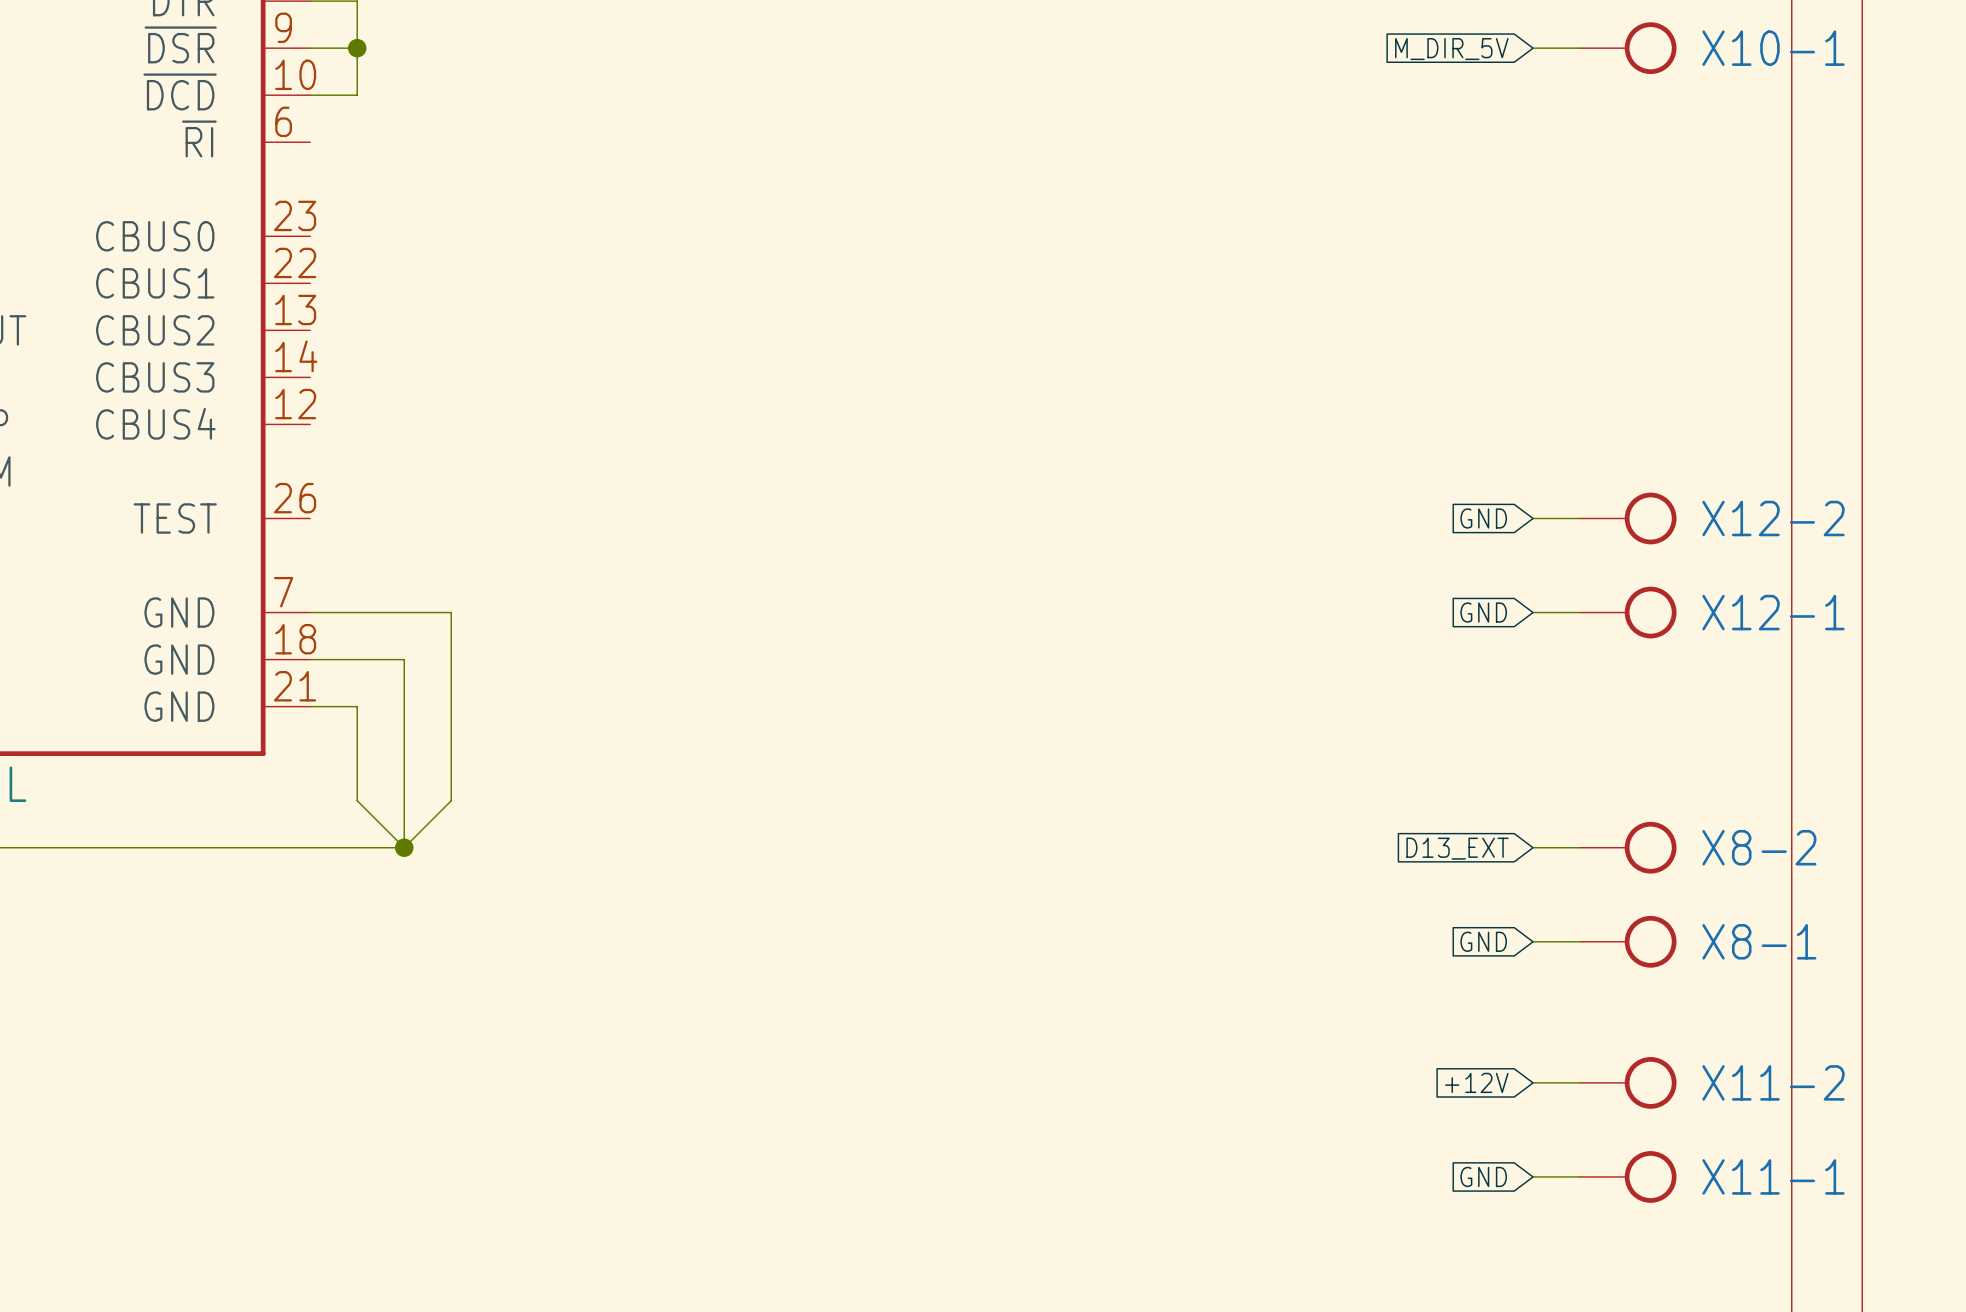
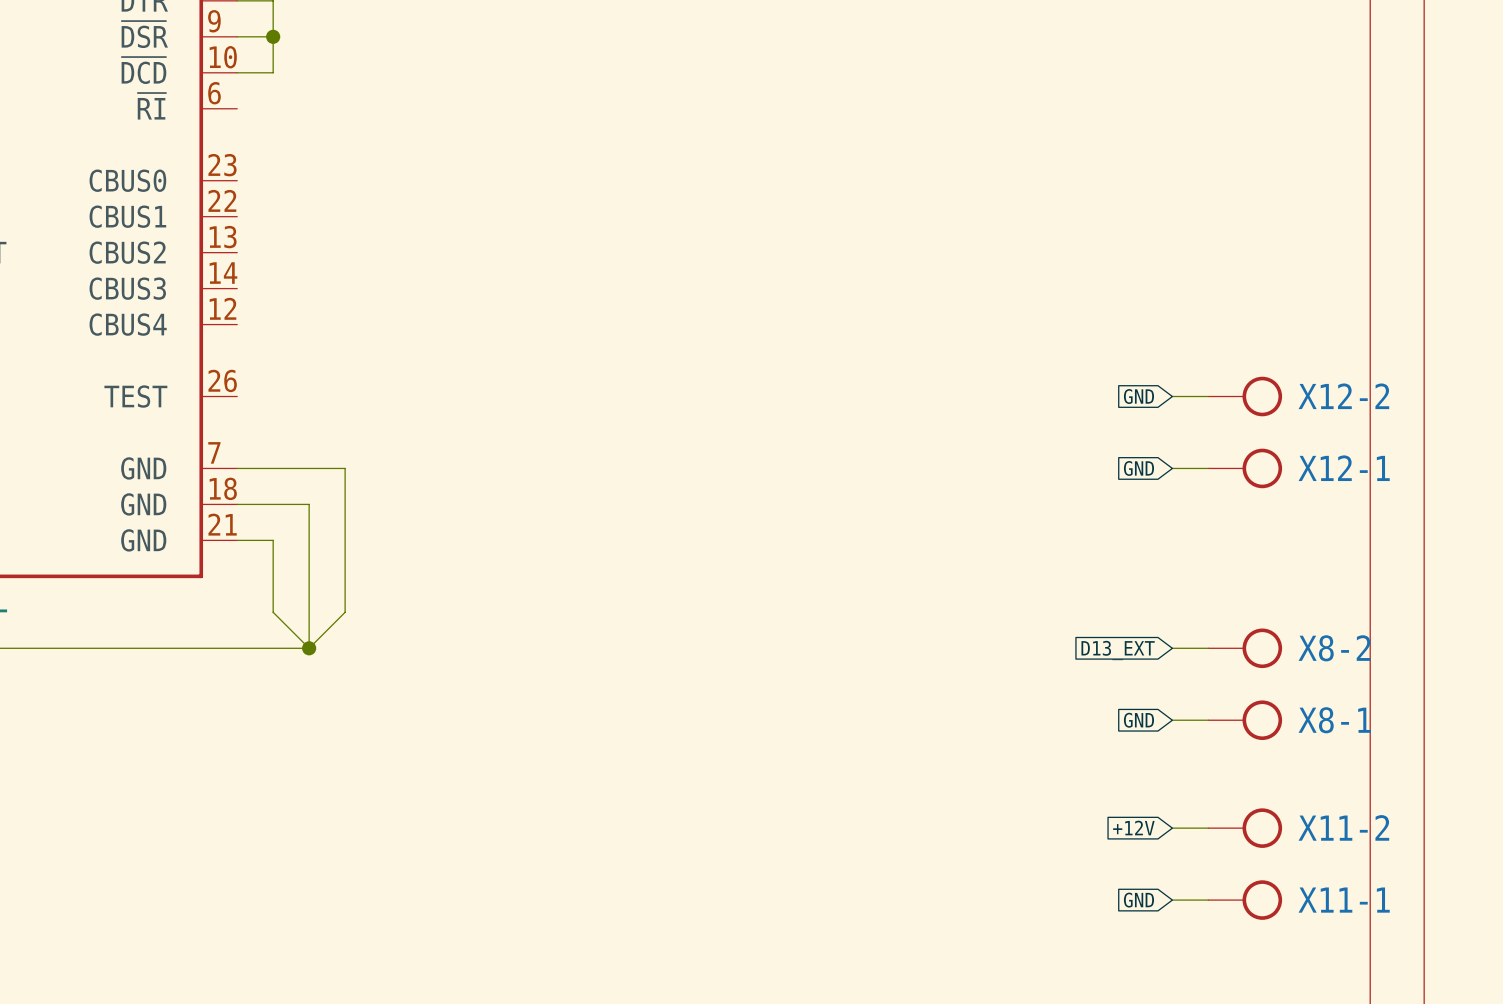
wire: (1533, 48) (1580, 48) -> none
X10-1: (1628, 48) -> none
global label: M_DIR_5V (1451, 49) -> none

